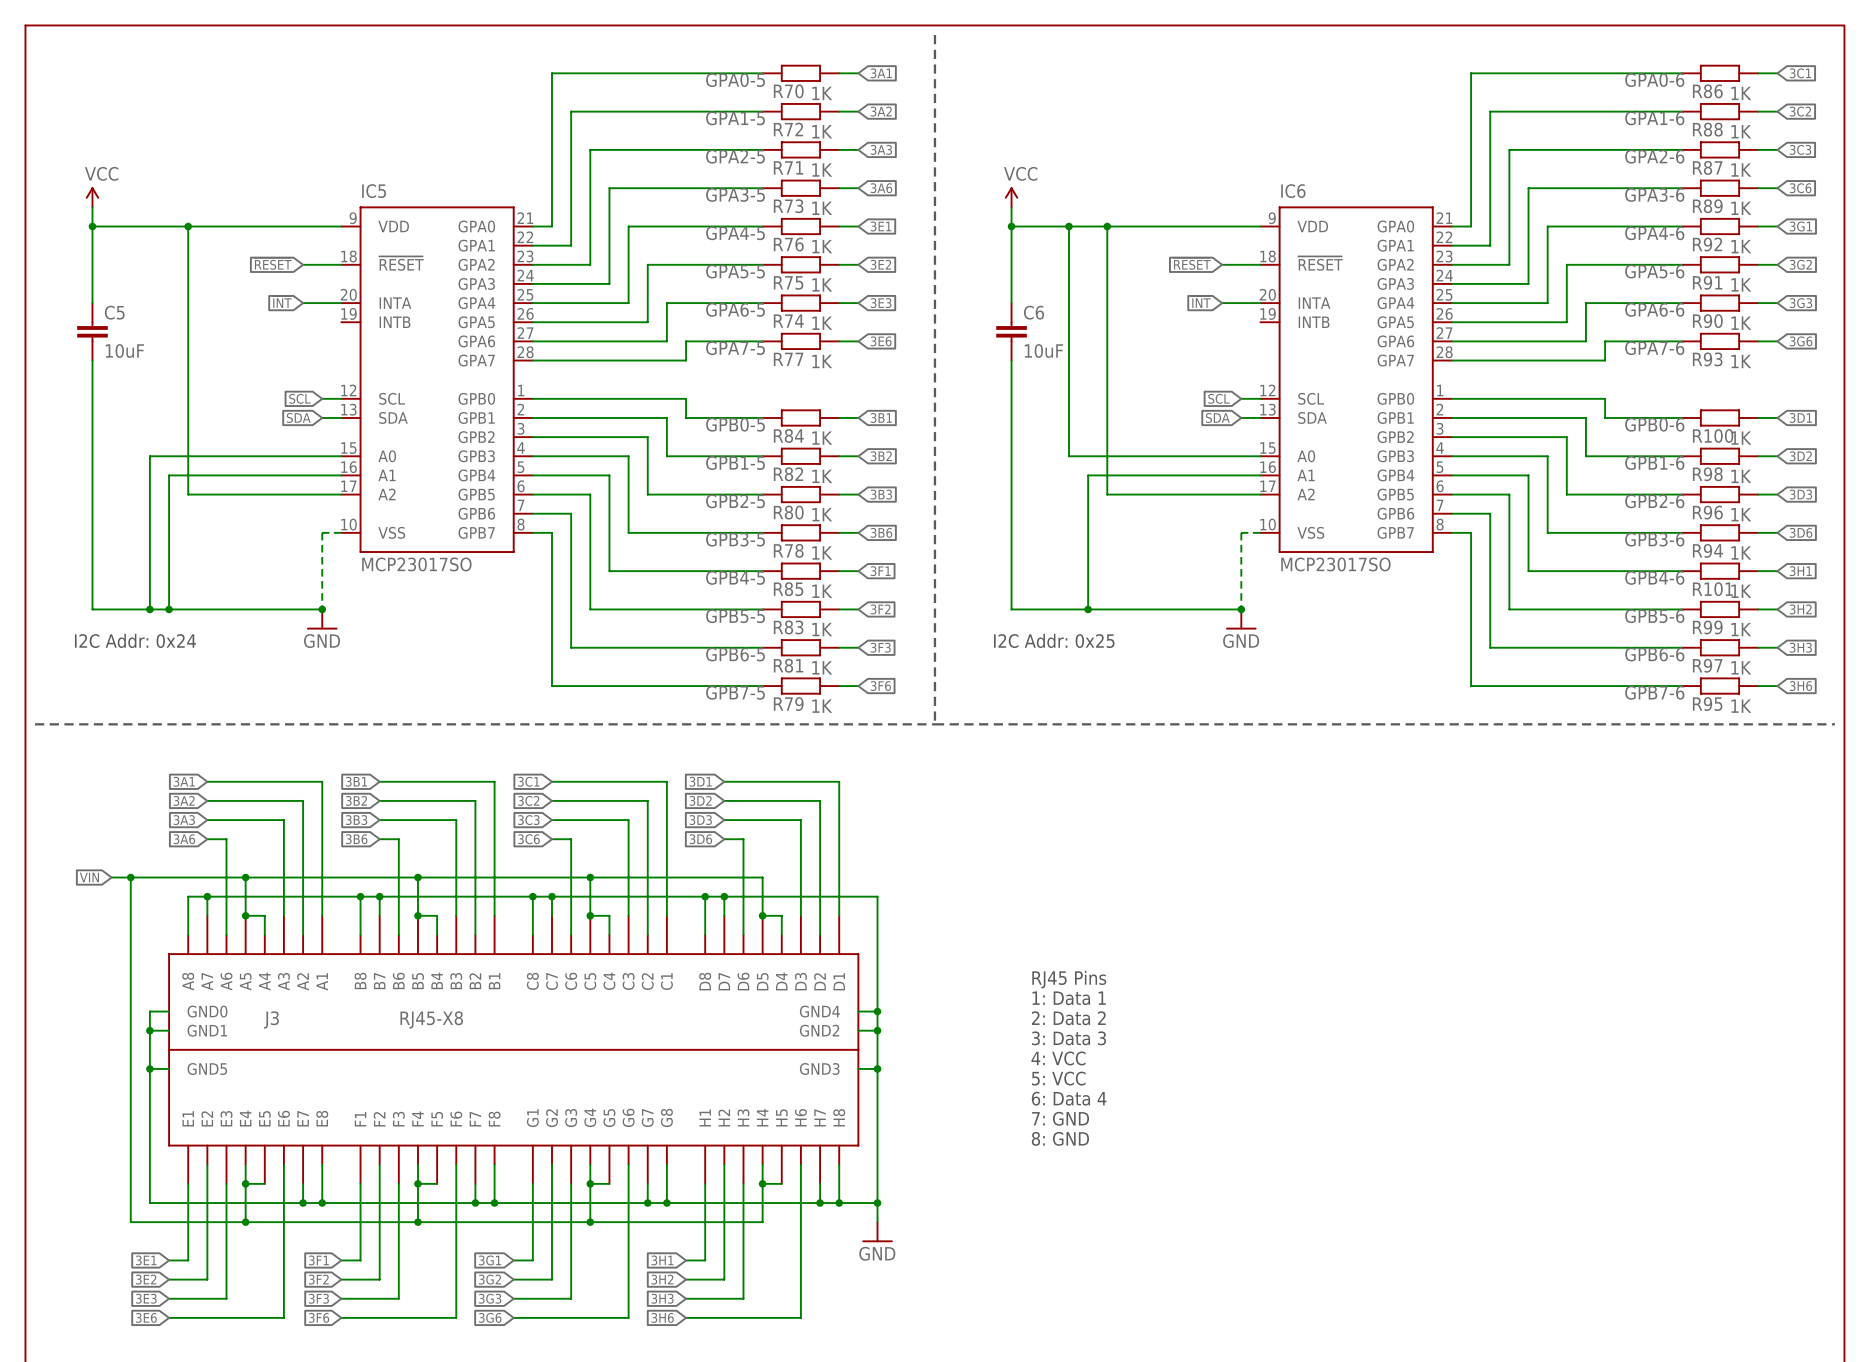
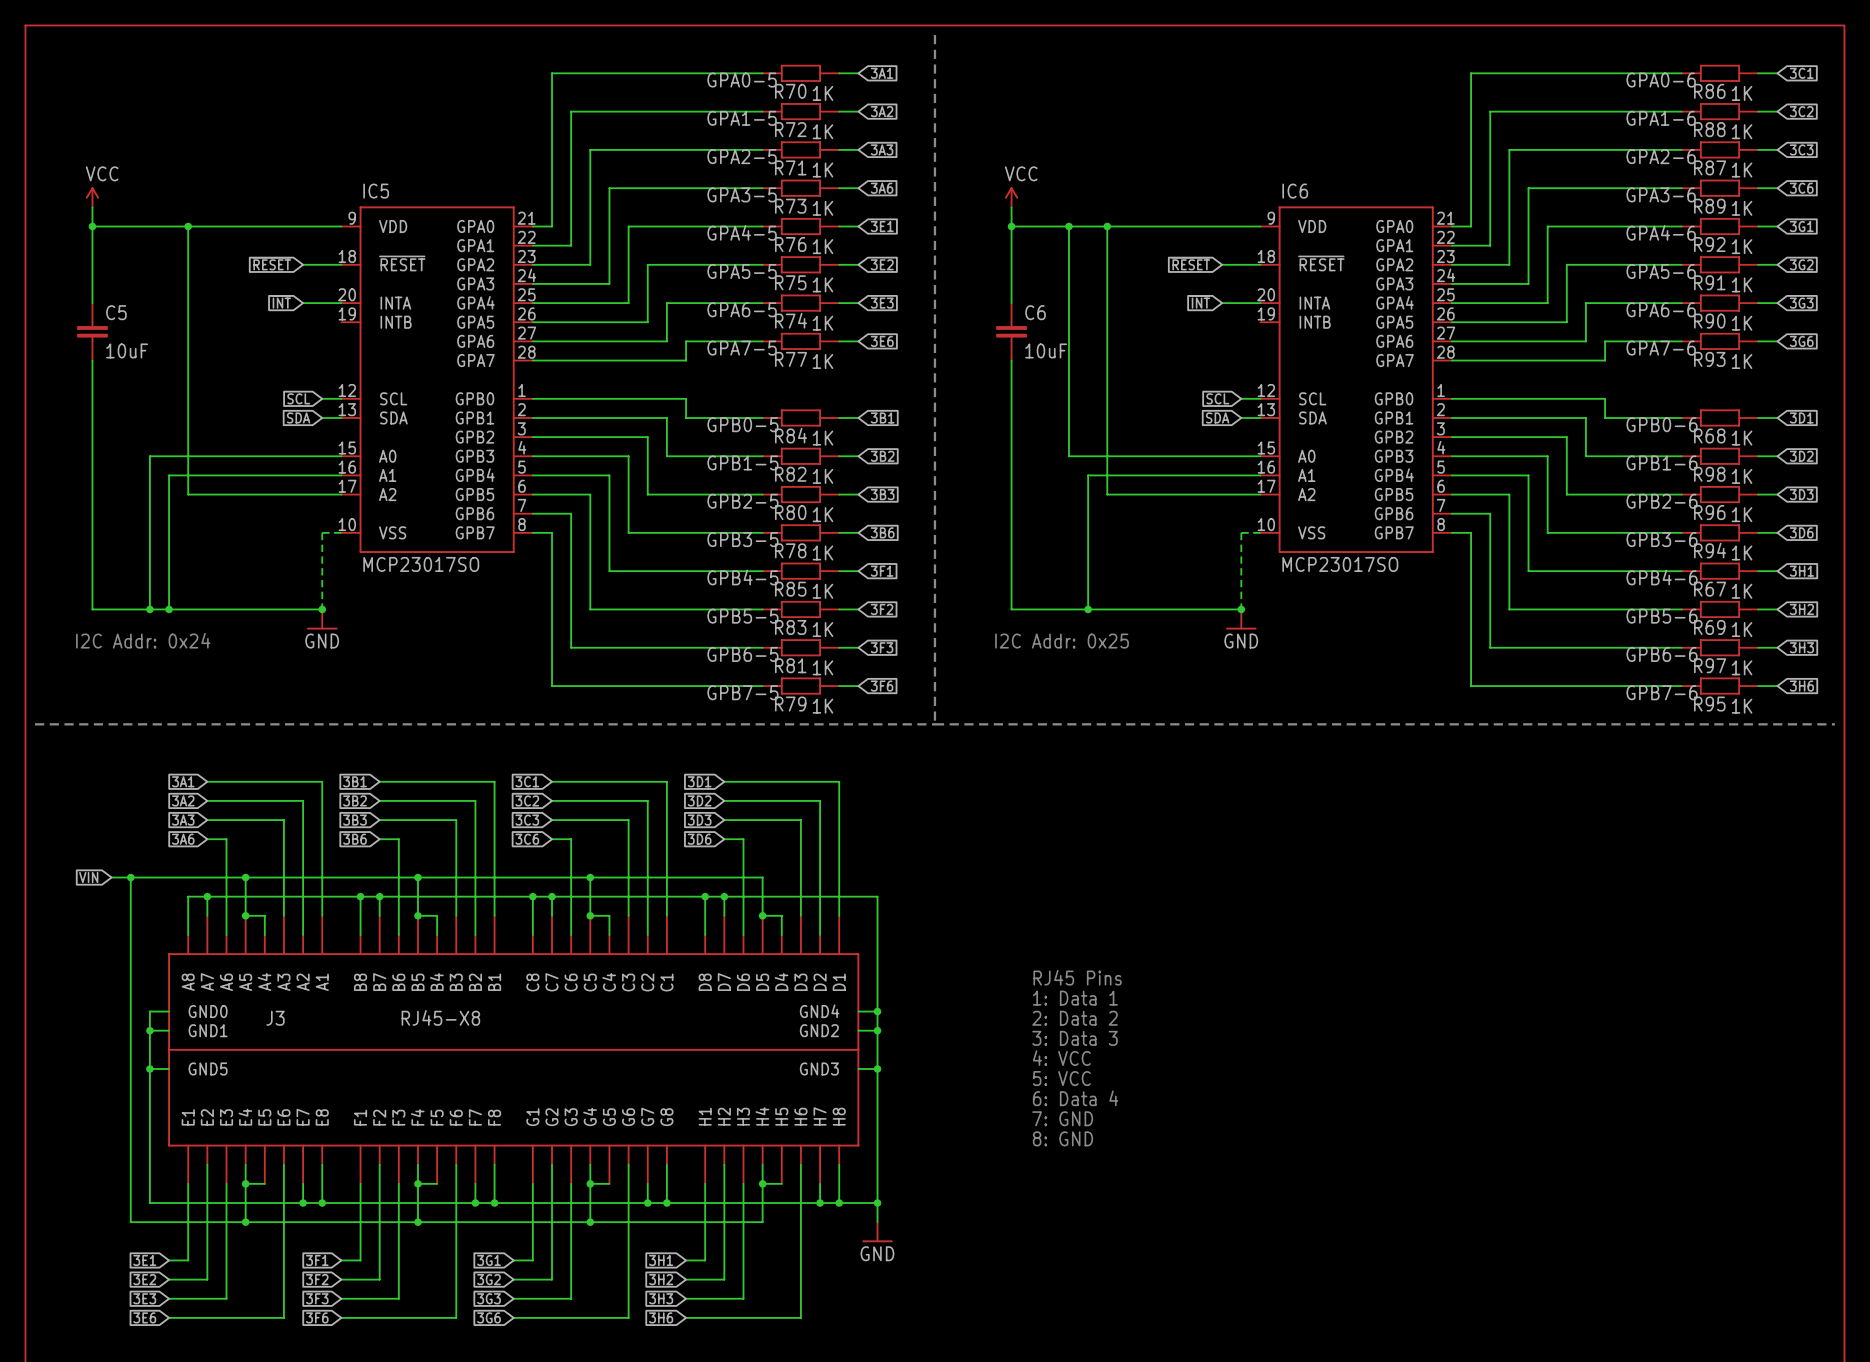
R100 name: R100 (1713, 435) -> R68 (1709, 435)
R101 name: R101 (1712, 589) -> R67 (1710, 589)
R99 name: R99 (1707, 627) -> R69 (1709, 627)

